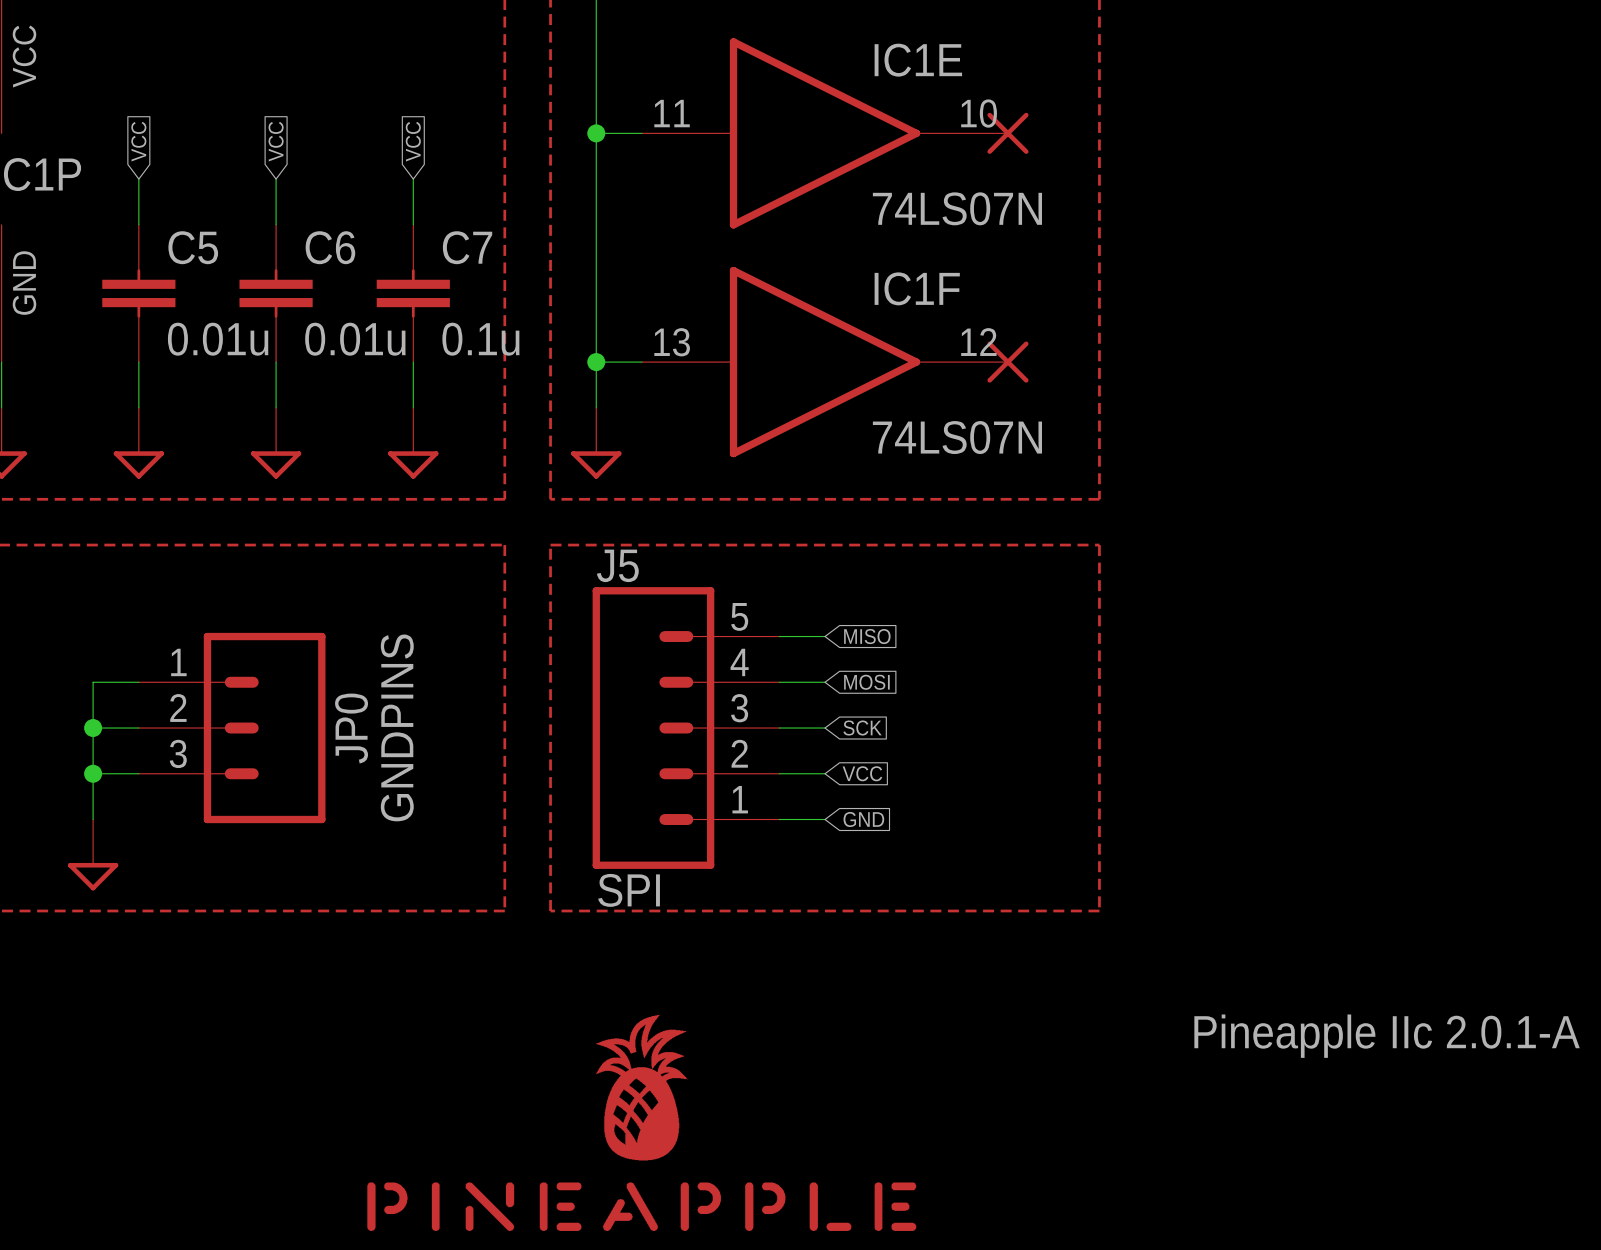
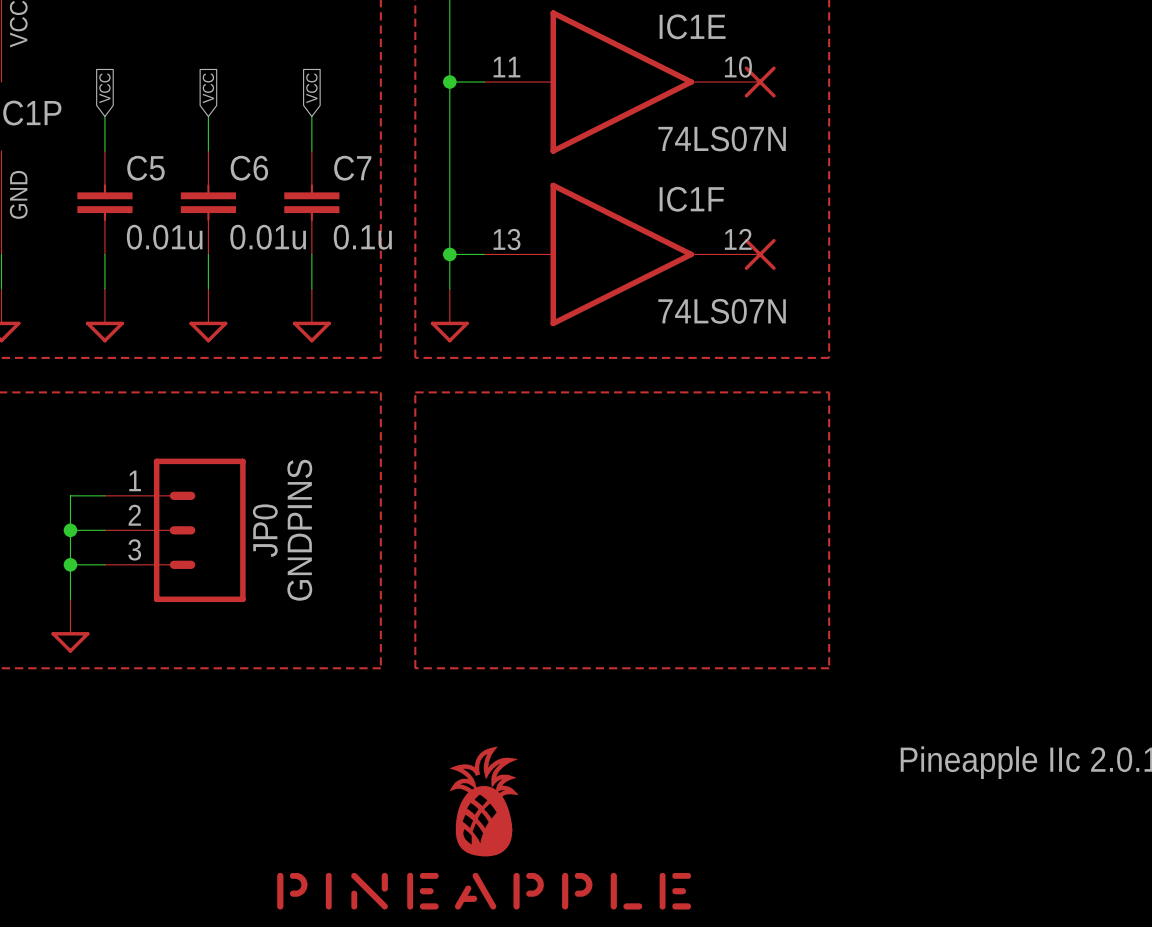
wire: (779, 636) (824, 636) -> none
global label: MISO (867, 636) -> none
wire: (779, 682) (824, 682) -> none
global label: MOSI (866, 682) -> none
J5: SPI (685, 728) -> none
wire: (779, 728) (824, 728) -> none
global label: SCK (862, 728) -> none
wire: (779, 773) (824, 773) -> none
global label: VCC (862, 773) -> none
wire: (779, 819) (824, 819) -> none
global label: GND (863, 819) -> none

